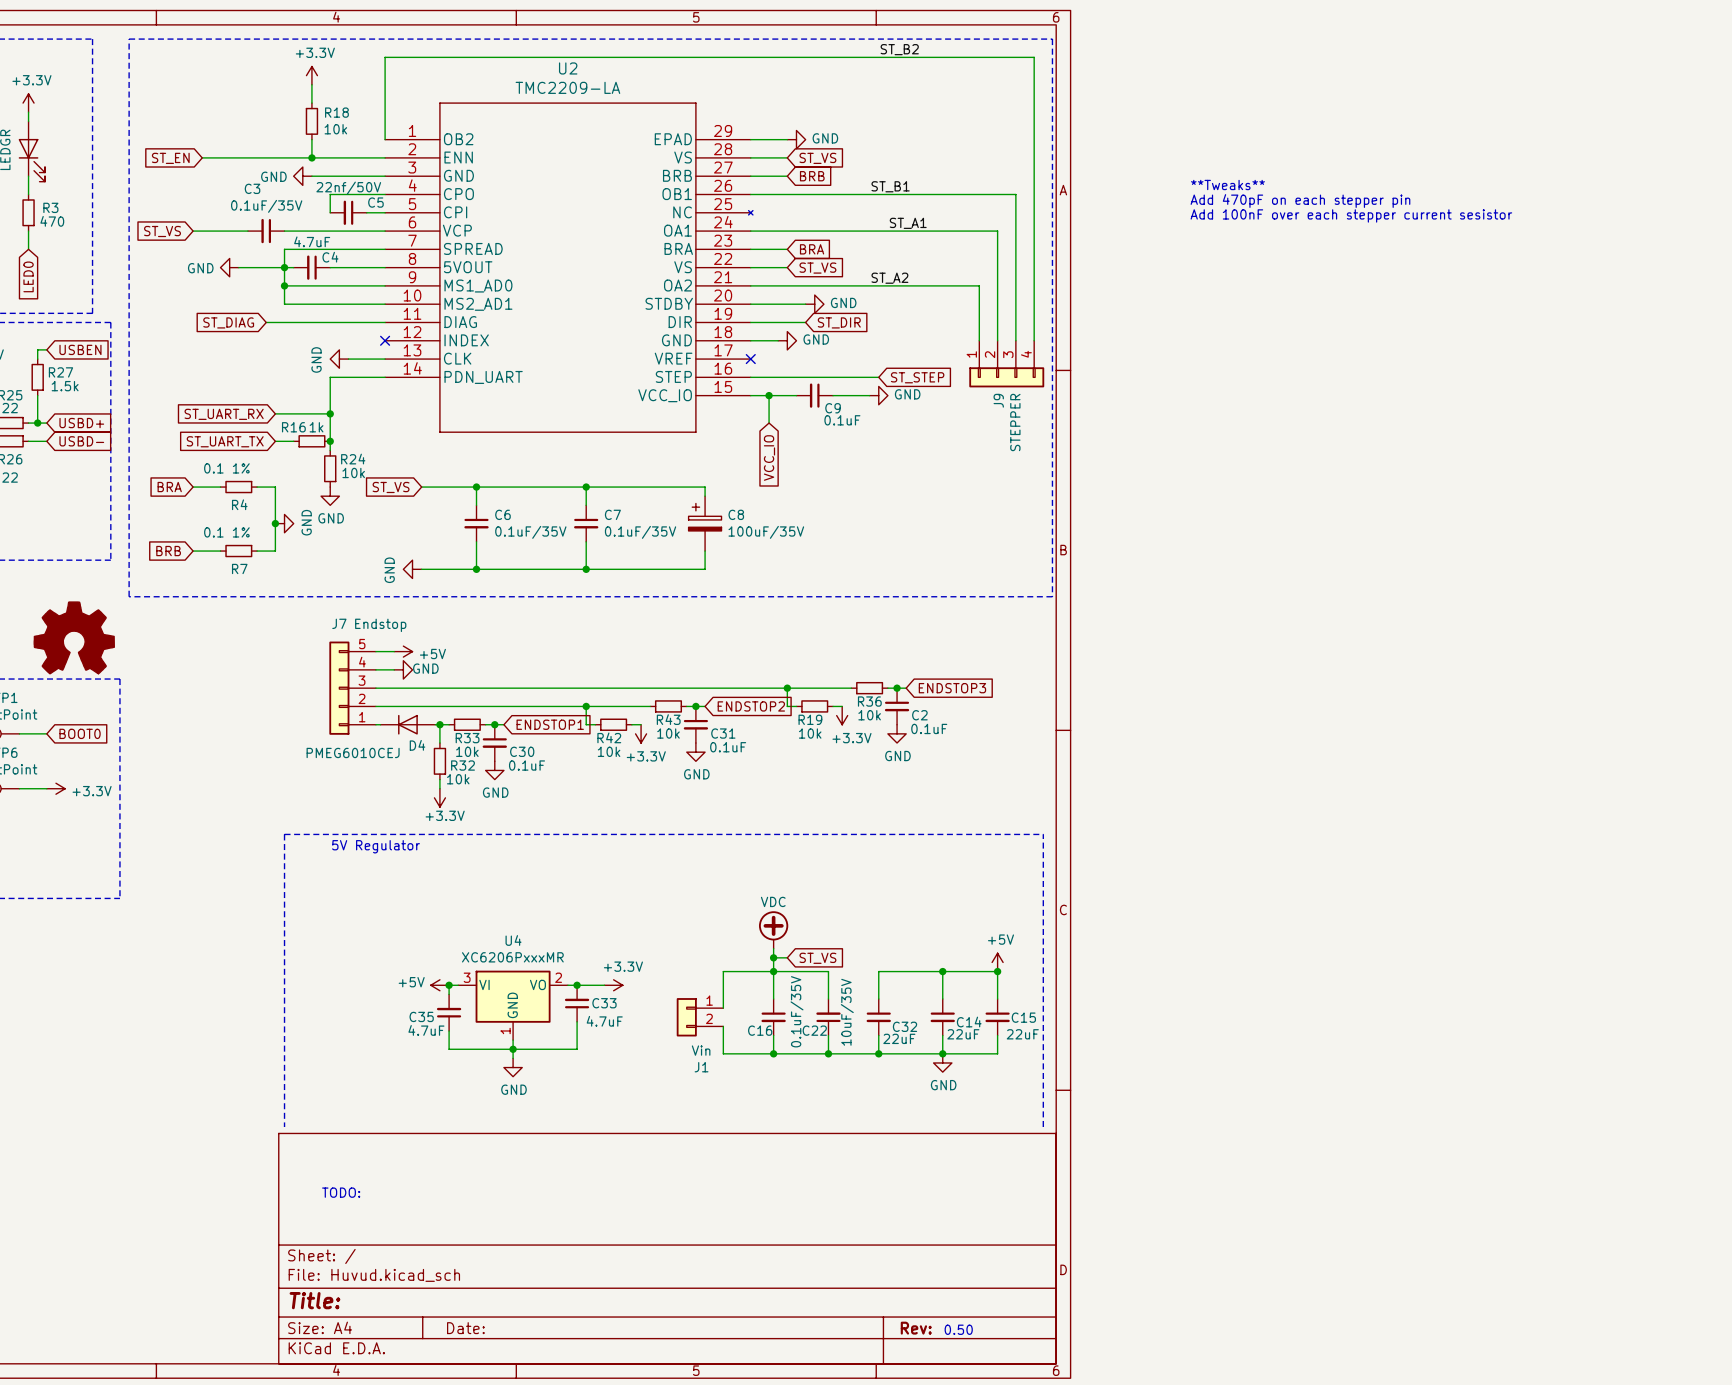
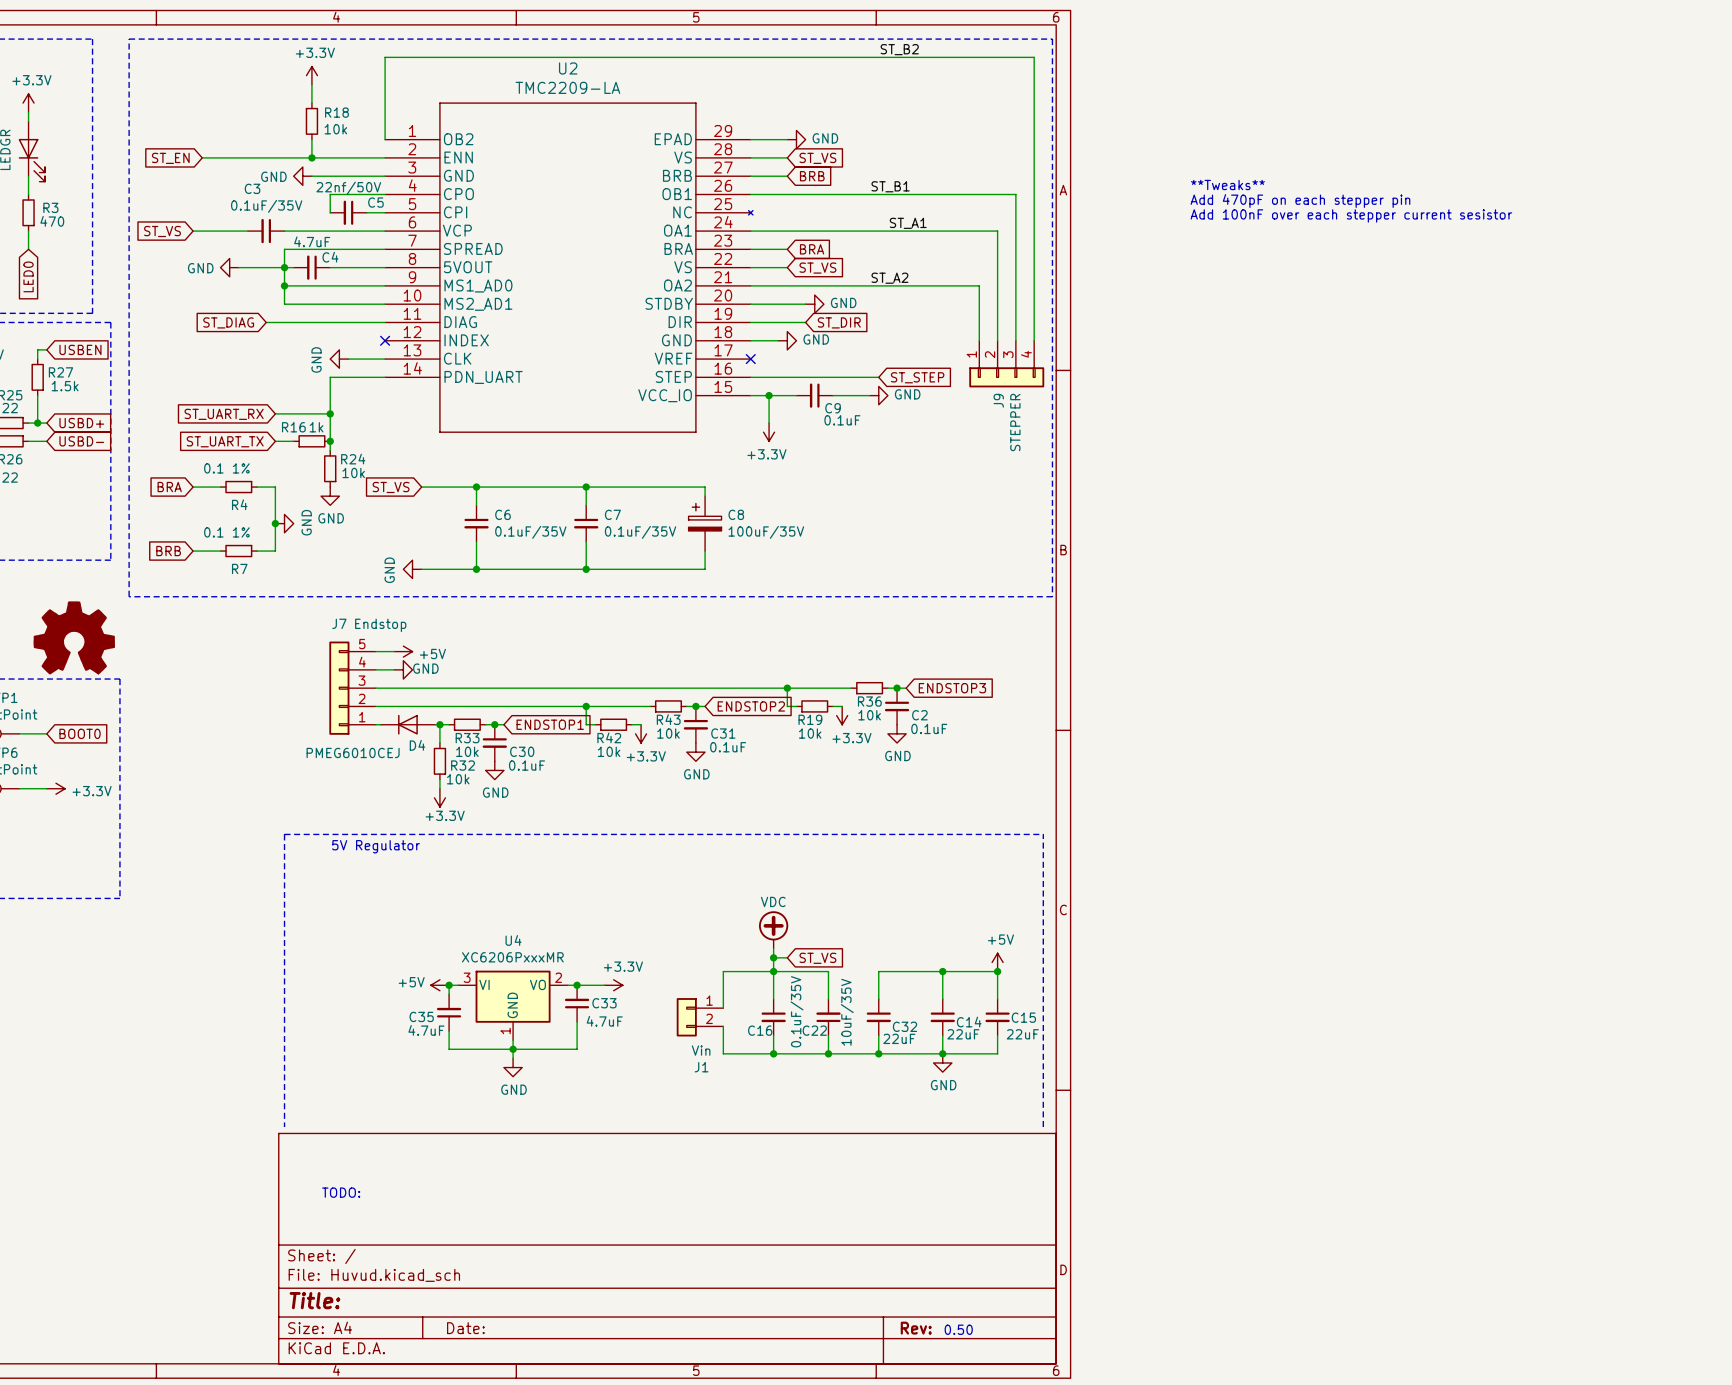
power symbol: none -> +3.3V (769, 432)
global label: VCC_IO (769, 457) -> none

